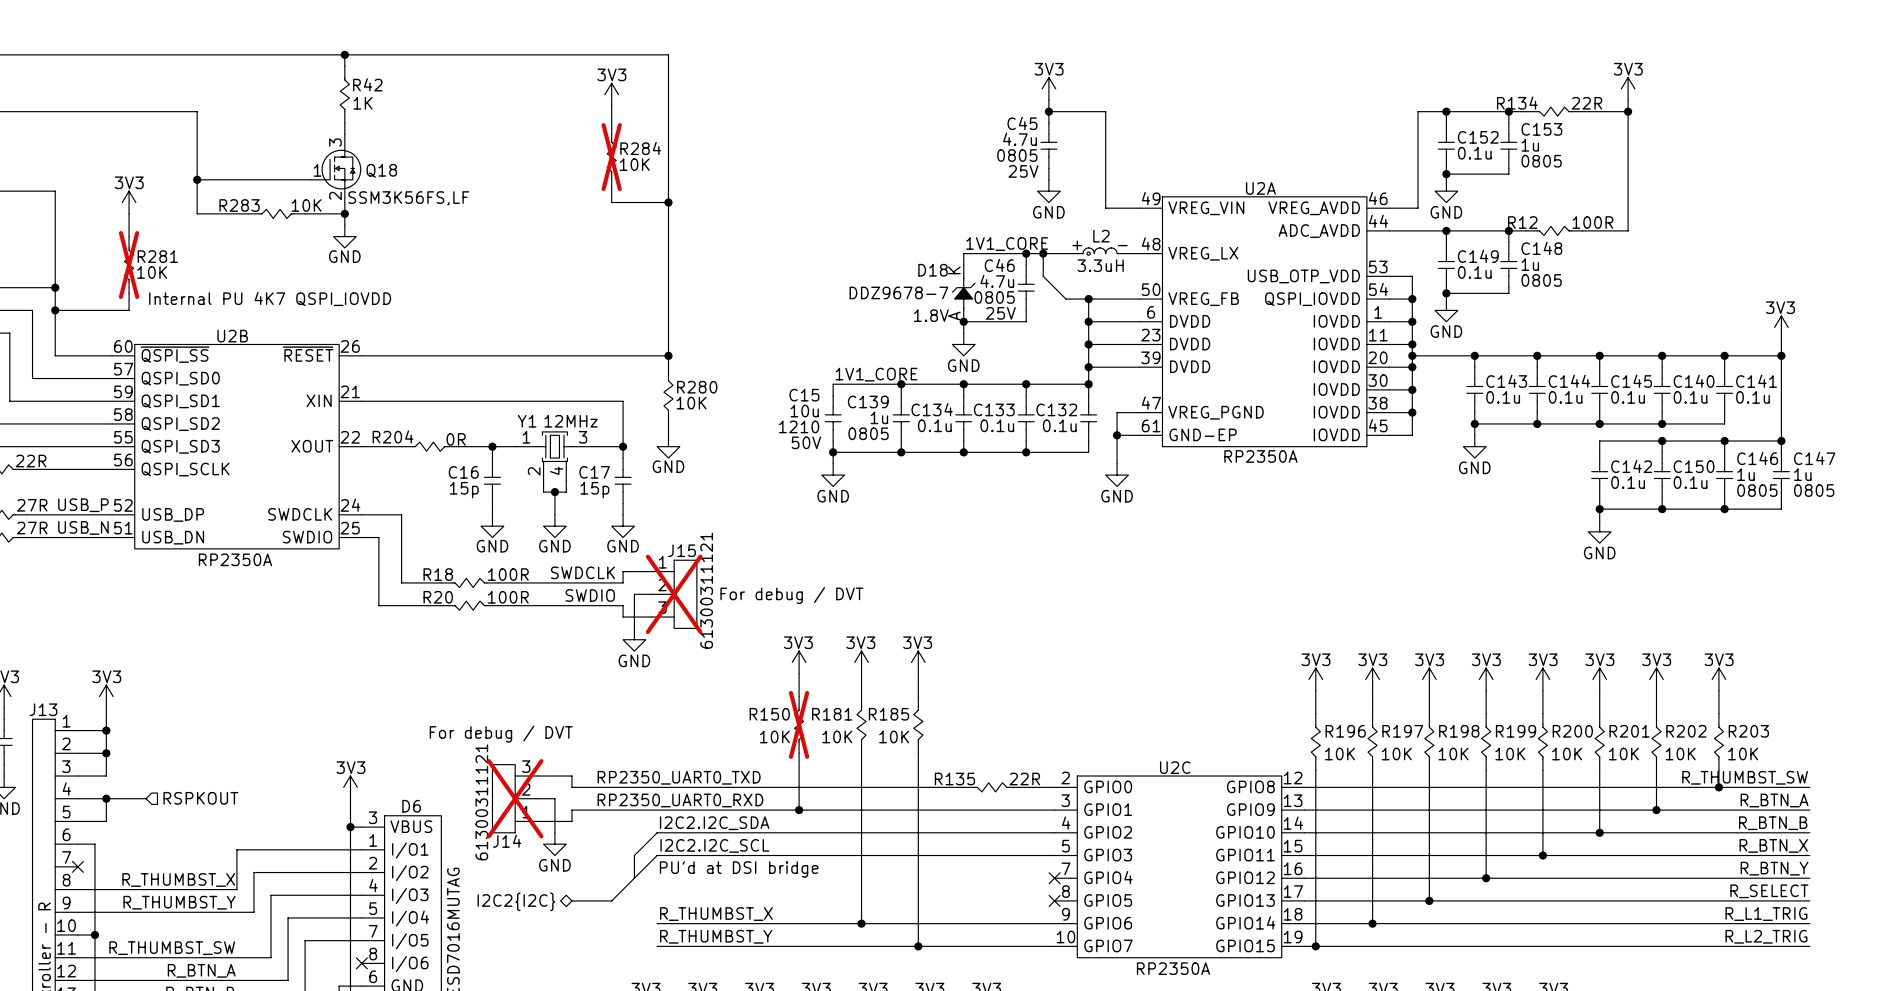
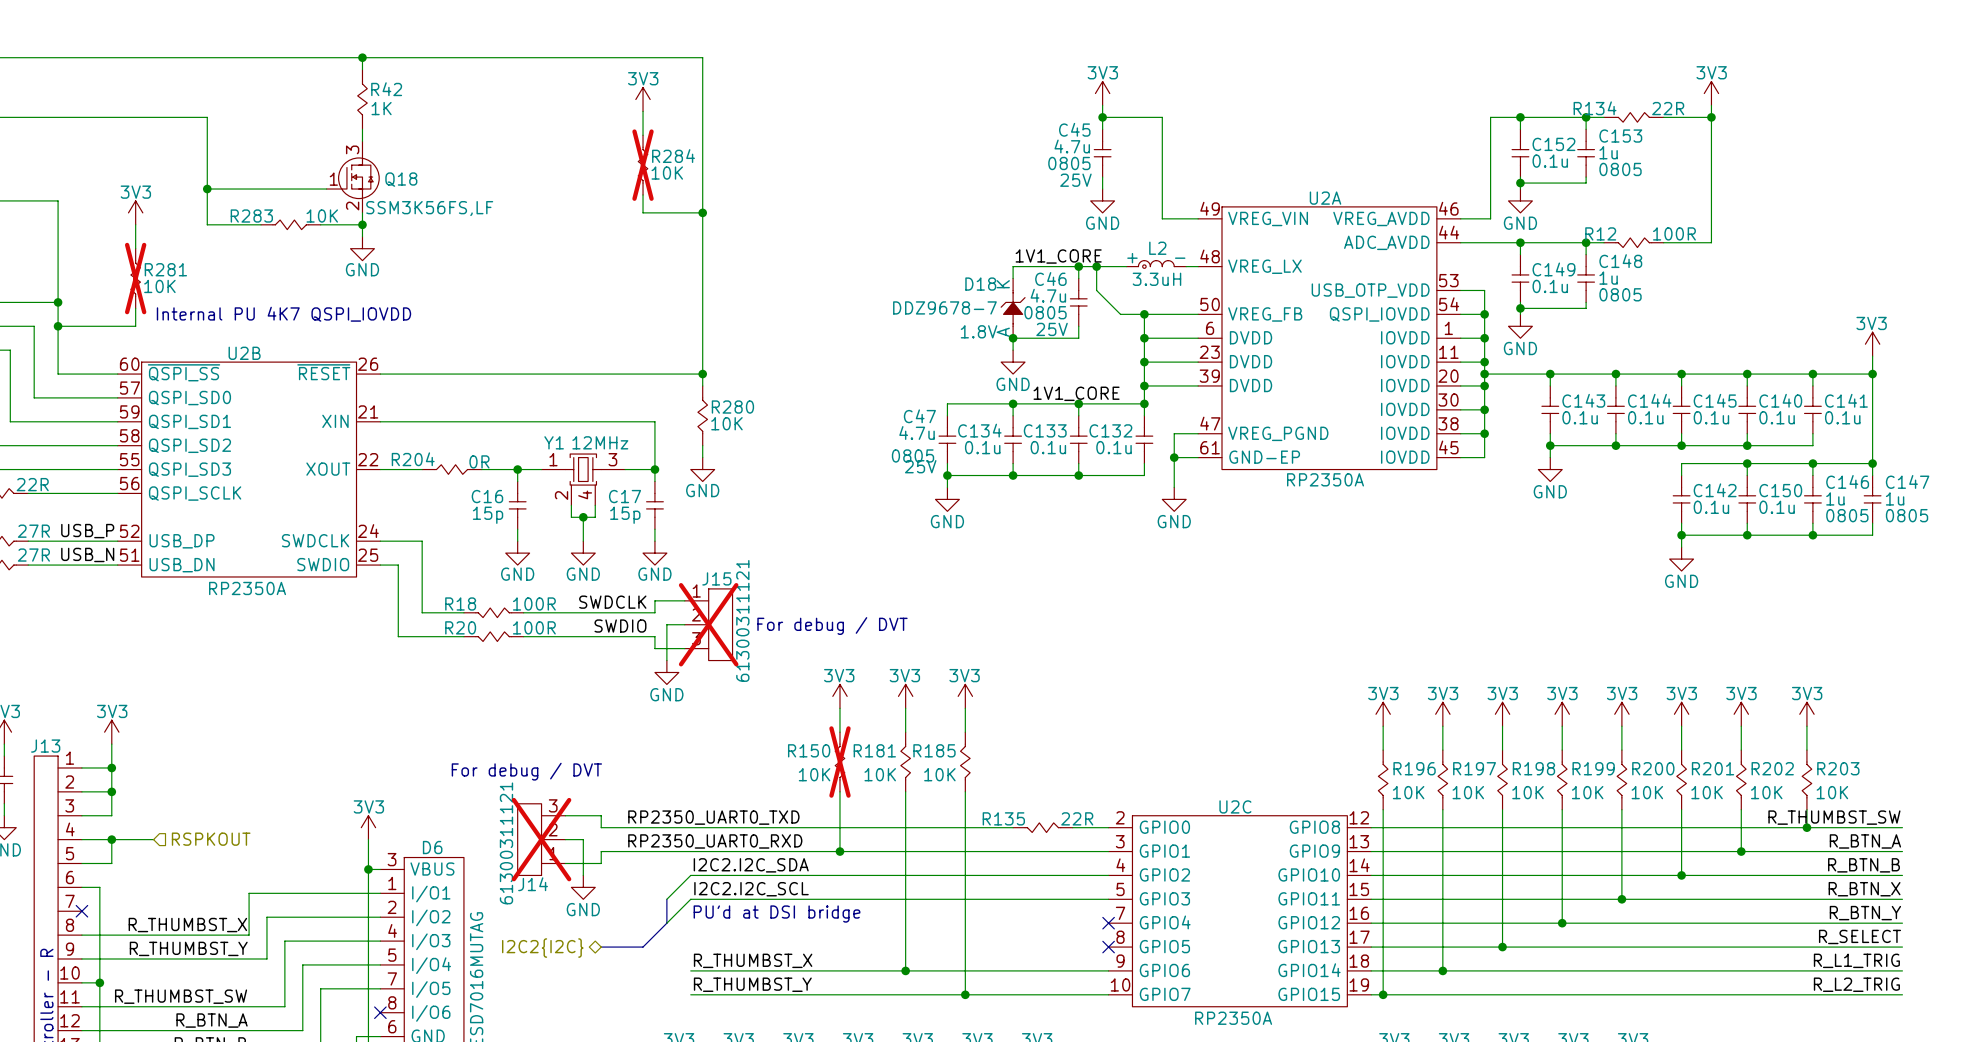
label position: 1V1_CORE (876, 374) -> 1V1_CORE (1076, 393)
wire: (901, 384) (833, 384) (833, 395) -> none
junction: (901, 384) -> none
C139 name: C139 (868, 401) -> C47 (919, 416)
C139 value: 1u (879, 417) -> 4.7u (917, 433)
C15: 10u (833, 418) -> none
wire: (833, 441) (833, 463) -> none
C139 text: none -> 25V (920, 466)
wire: (833, 452) (901, 452) -> (947, 487) (947, 475)
junction: (833, 452) -> none
power symbol position: GND (833, 475) -> GND (947, 499)

